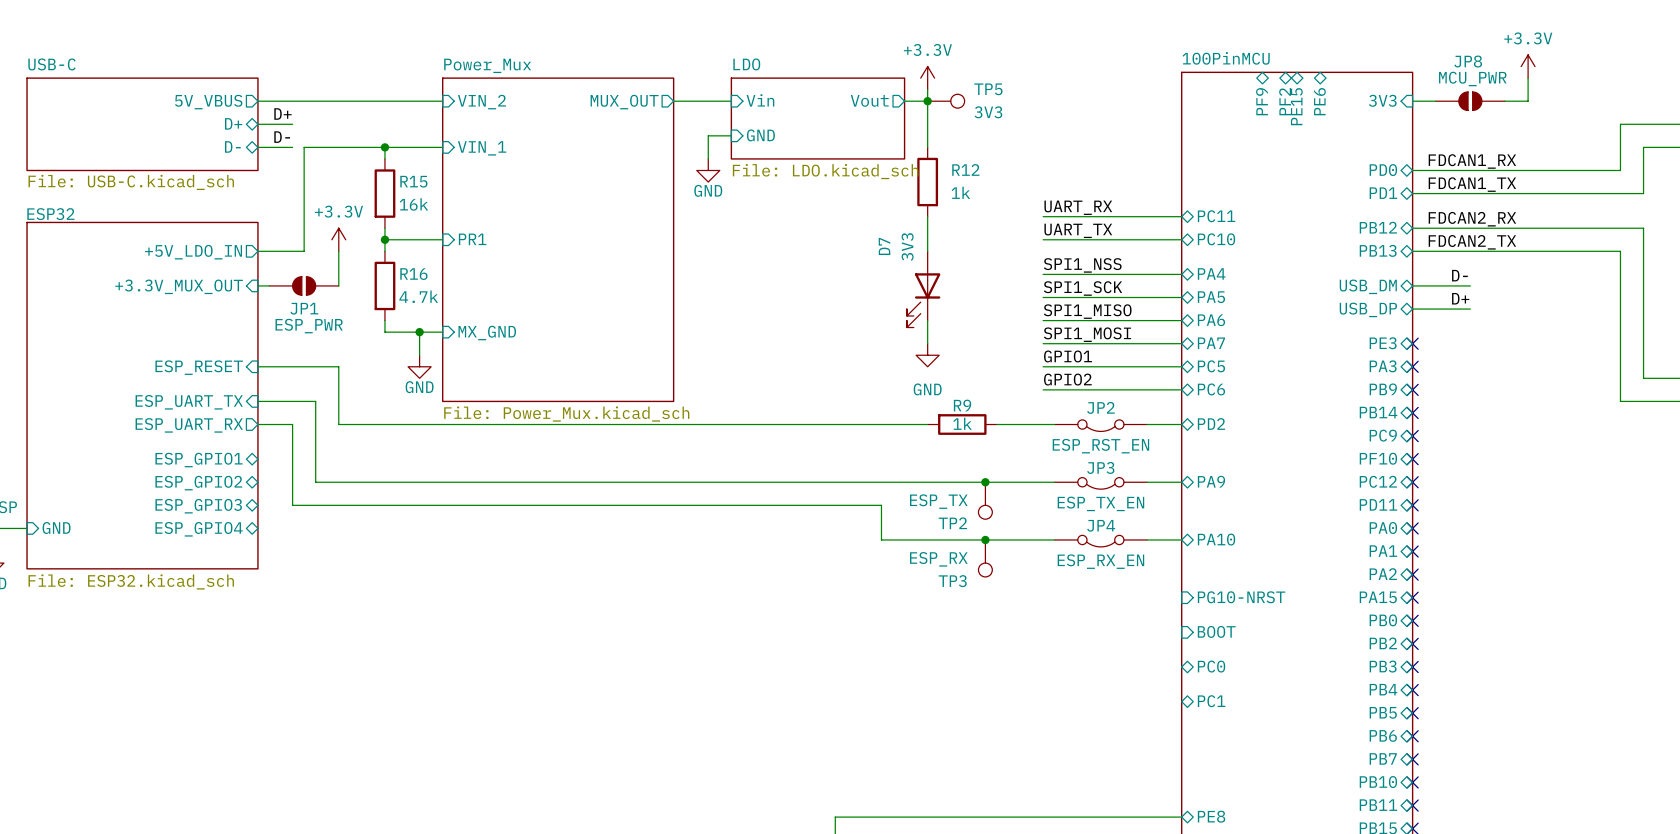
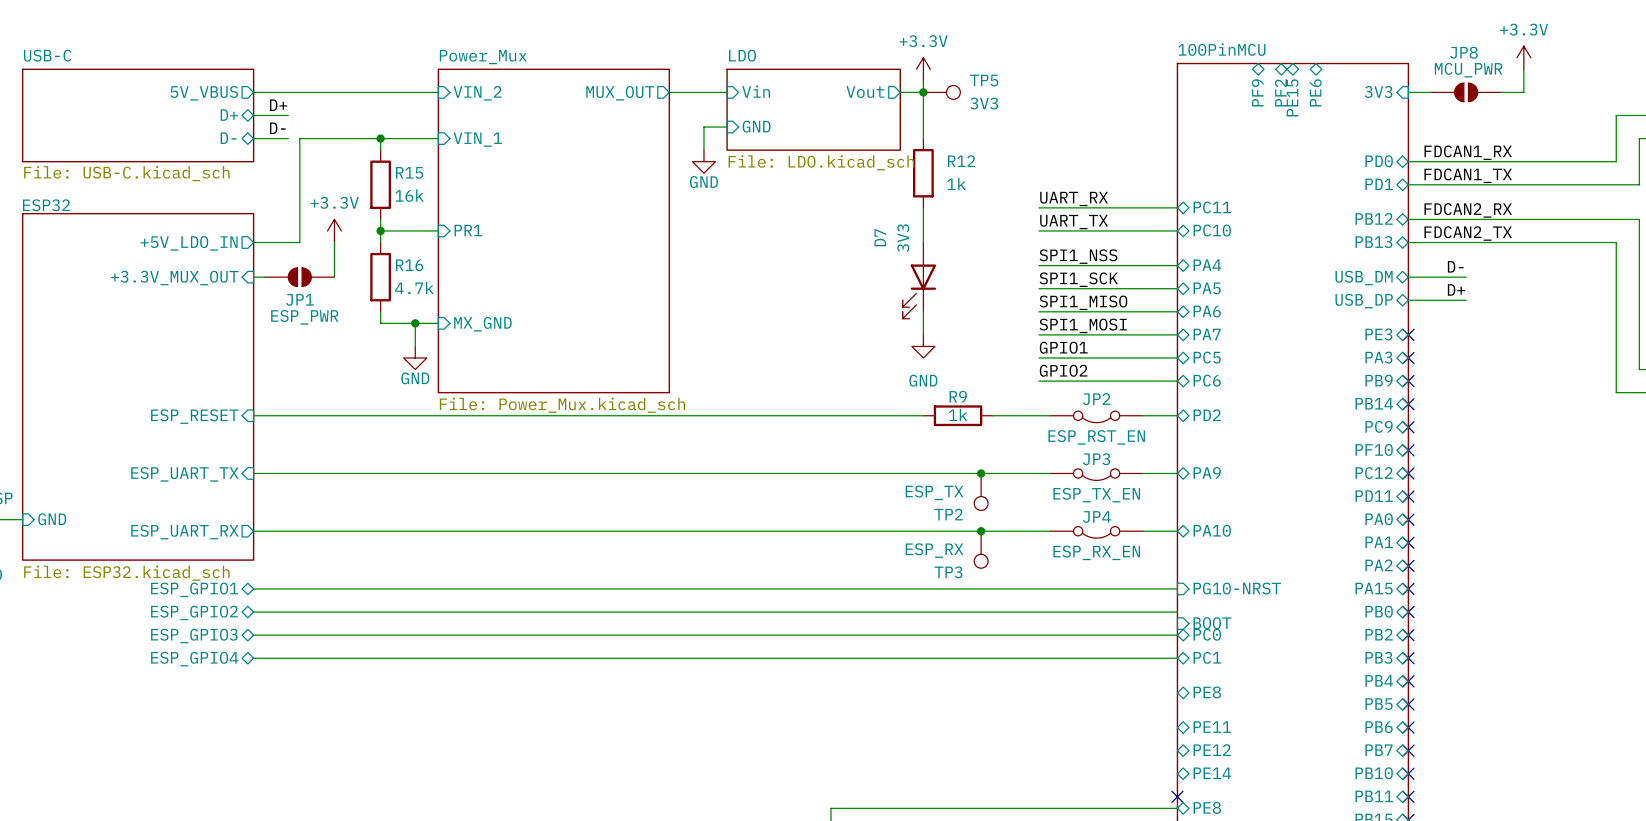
wire: (257, 366) (338, 366) (338, 424) -> (288, 415) (334, 415)
sheet pin: ESP_RESET (199, 367) -> none
wire: (257, 401) (315, 401) (315, 482) -> (253, 473) (311, 473)
sheet pin: ESP_UART_TX (189, 402) -> none
wire: (292, 424) (292, 505) (881, 505) (881, 539) -> (253, 531) (877, 531)
sheet pin shape: output (189, 425) -> input (194, 416)
sheet pin: ESP_UART_RX (189, 425) -> ESP_RESET (194, 416)
sheet pin position: ESP_GPIO1 (198, 460) -> ESP_GPIO1 (194, 589)
sheet pin shape: bidirectional (198, 483) -> input (184, 474)
sheet pin: ESP_GPIO2 (198, 483) -> ESP_UART_TX (184, 474)
sheet pin position: ESP_GPIO3 (198, 506) -> ESP_GPIO3 (194, 636)
sheet pin position: ESP_GPIO4 (199, 529) -> ESP_GPIO4 (194, 659)
sheet pin: none -> ESP_UART_RX (184, 532)
wire: none -> (253, 588) (1177, 588)
wire: none -> (253, 612) (1177, 612)
sheet pin: none -> ESP_GPIO2 (194, 612)
wire: none -> (253, 635) (1177, 635)
sheet pin: none -> PC0 (1207, 634)
wire: none -> (253, 658) (1177, 658)
sheet pin: PC0 (1211, 666) -> PC1 (1207, 657)
sheet pin: PC1 (1211, 701) -> PE8 (1207, 692)
sheet pin: none -> PE11 (1212, 727)
sheet pin: none -> PE12 (1212, 750)
sheet pin: none -> PE14 (1212, 773)
no-connect mark: none -> (1177, 796)

